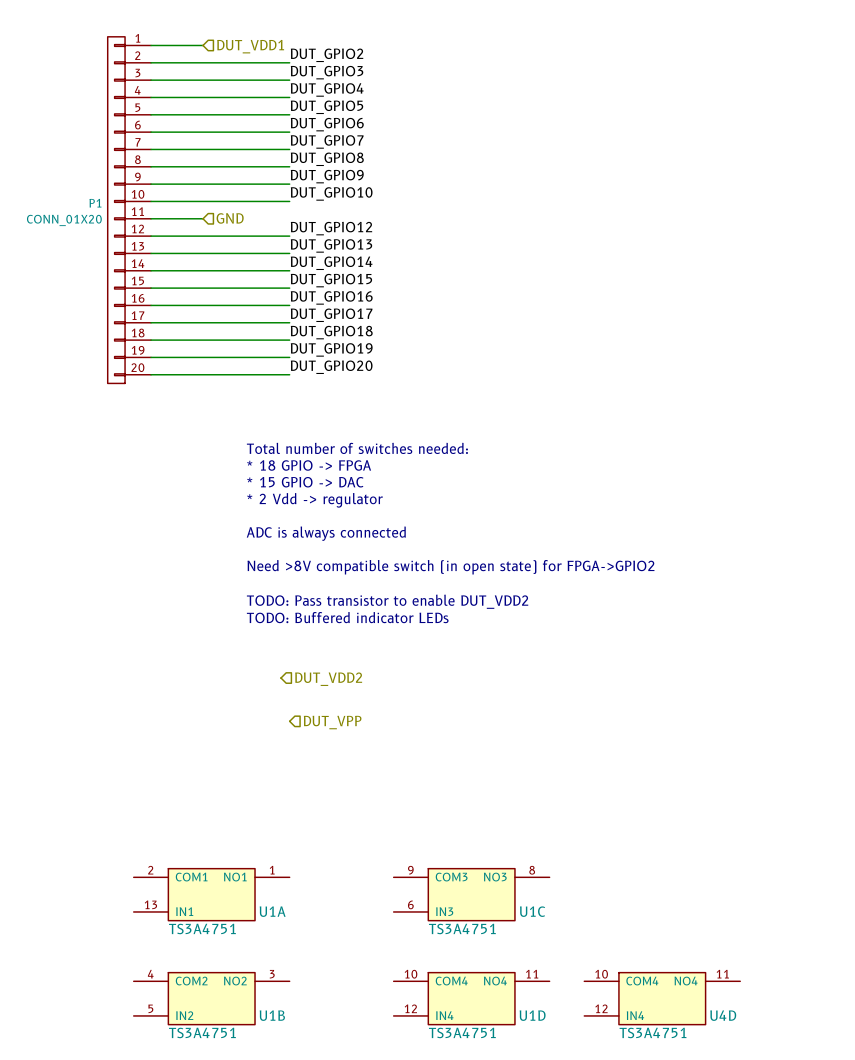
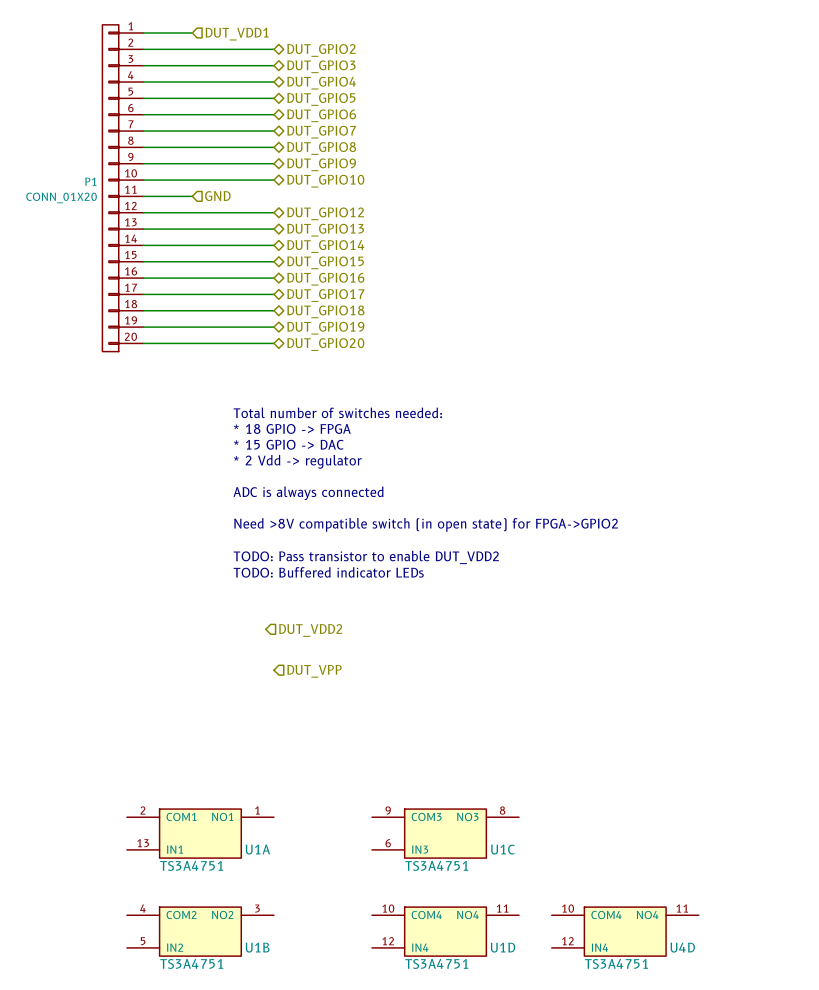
label: DUT_GPIO2 (327, 55) -> none
hierarchical label: none -> DUT_GPIO2 (321, 50)
label: DUT_GPIO3 (327, 72) -> none
hierarchical label: none -> DUT_GPIO3 (321, 66)
label: DUT_GPIO4 (327, 89) -> none
hierarchical label: none -> DUT_GPIO4 (321, 83)
label: DUT_GPIO5 (327, 107) -> none
hierarchical label: none -> DUT_GPIO5 (321, 99)
label: DUT_GPIO6 (327, 124) -> none
hierarchical label: none -> DUT_GPIO6 (321, 115)
label: DUT_GPIO7 (327, 141) -> none
hierarchical label: none -> DUT_GPIO7 (321, 132)
label: DUT_GPIO8 (327, 159) -> none
hierarchical label: none -> DUT_GPIO8 (321, 148)
label: DUT_GPIO9 (327, 176) -> none
hierarchical label: none -> DUT_GPIO9 (321, 164)
label: DUT_GPIO10 (331, 193) -> none
hierarchical label: none -> DUT_GPIO10 (325, 181)
label: DUT_GPIO12 (331, 228) -> none
hierarchical label: none -> DUT_GPIO12 (325, 213)
label: DUT_GPIO13 (331, 245) -> none
hierarchical label: none -> DUT_GPIO13 (325, 230)
label: DUT_GPIO14 (331, 263) -> none
hierarchical label: none -> DUT_GPIO14 (325, 246)
label: DUT_GPIO15 (331, 280) -> none
hierarchical label: none -> DUT_GPIO15 (325, 262)
label: DUT_GPIO16 (331, 297) -> none
hierarchical label: none -> DUT_GPIO16 (325, 279)
label: DUT_GPIO17 (331, 315) -> none
hierarchical label: none -> DUT_GPIO17 (325, 295)
label: DUT_GPIO18 (331, 332) -> none
hierarchical label: none -> DUT_GPIO18 (325, 311)
label: DUT_GPIO19 (331, 349) -> none
hierarchical label: none -> DUT_GPIO19 (325, 328)
label: DUT_GPIO20 (331, 367) -> none
hierarchical label: none -> DUT_GPIO20 (325, 344)

